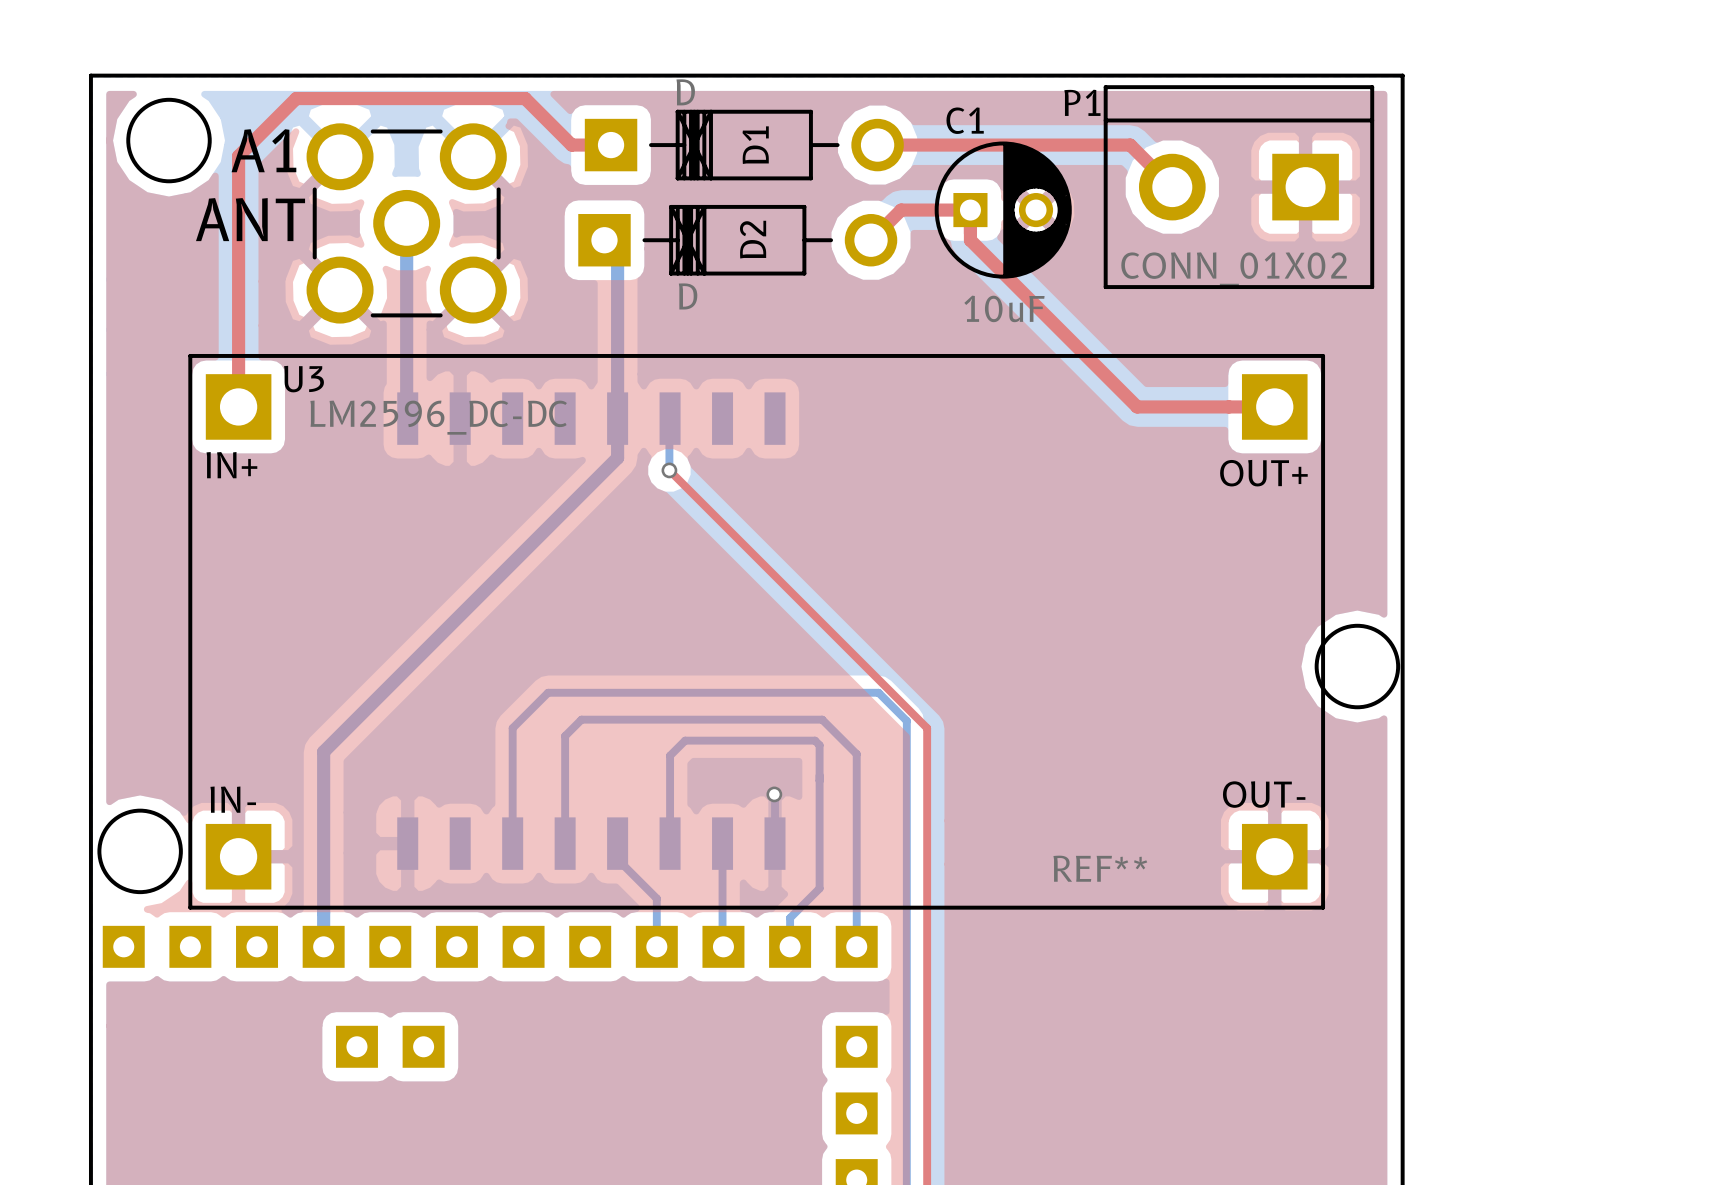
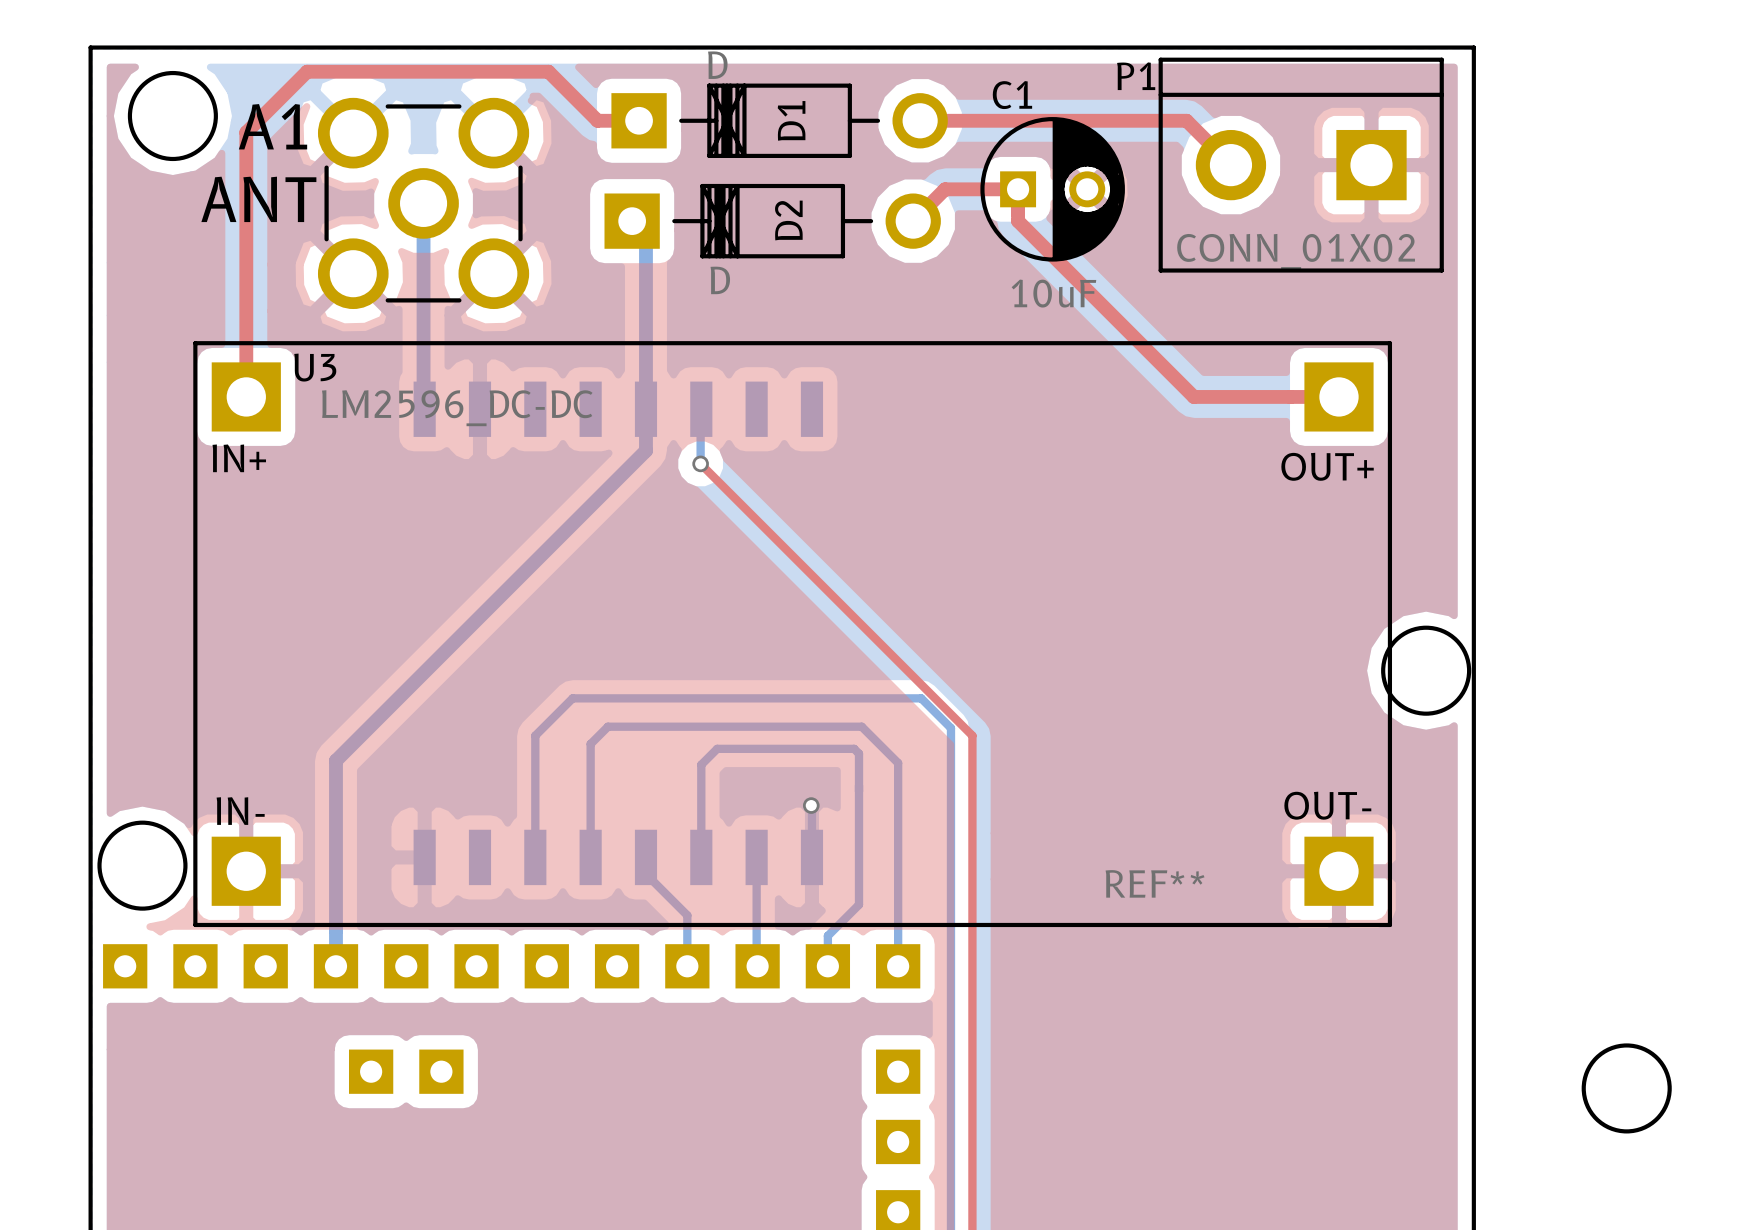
round board edge: none -> [1581, 1043, 1672, 1134]

